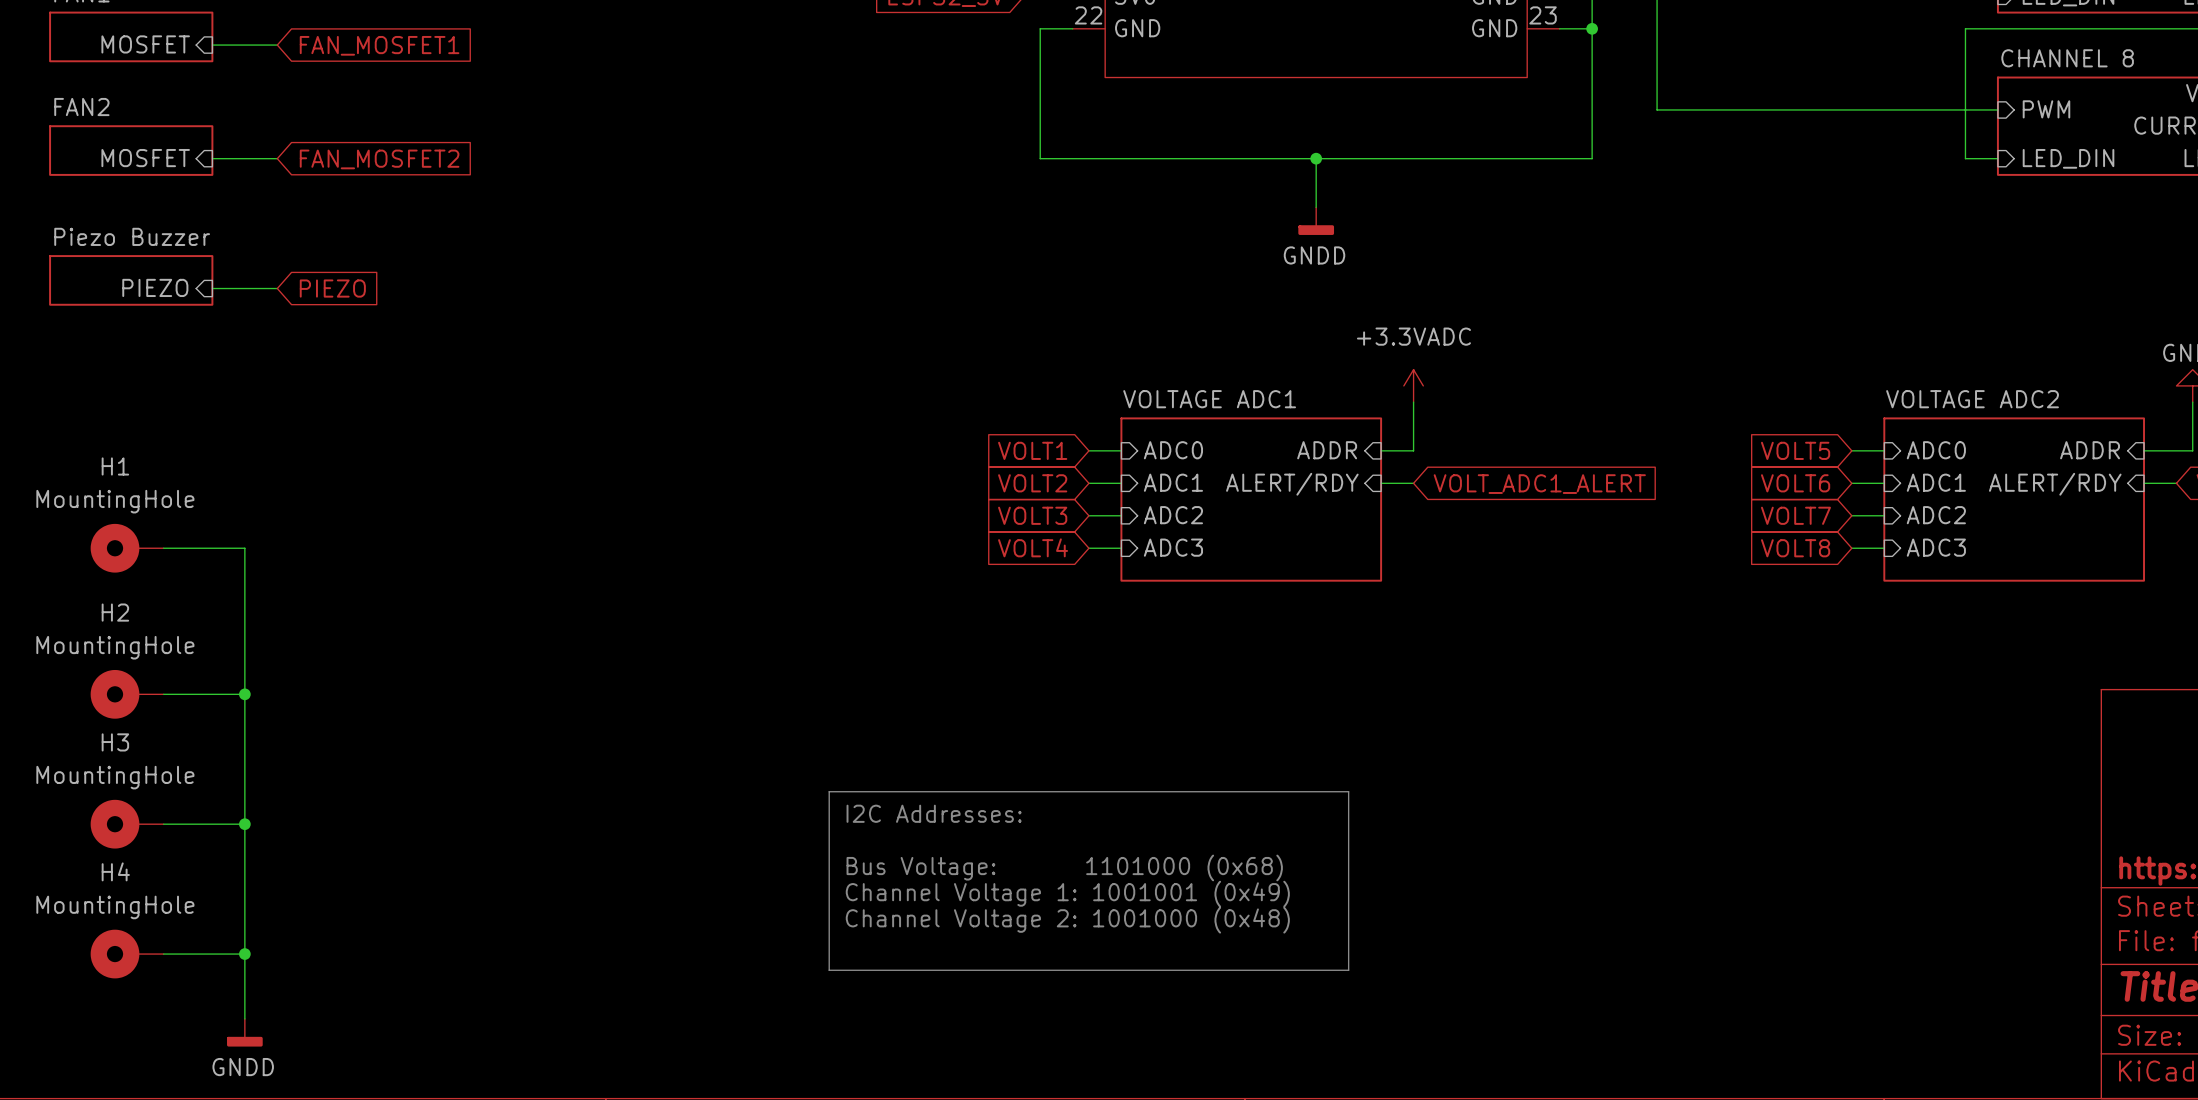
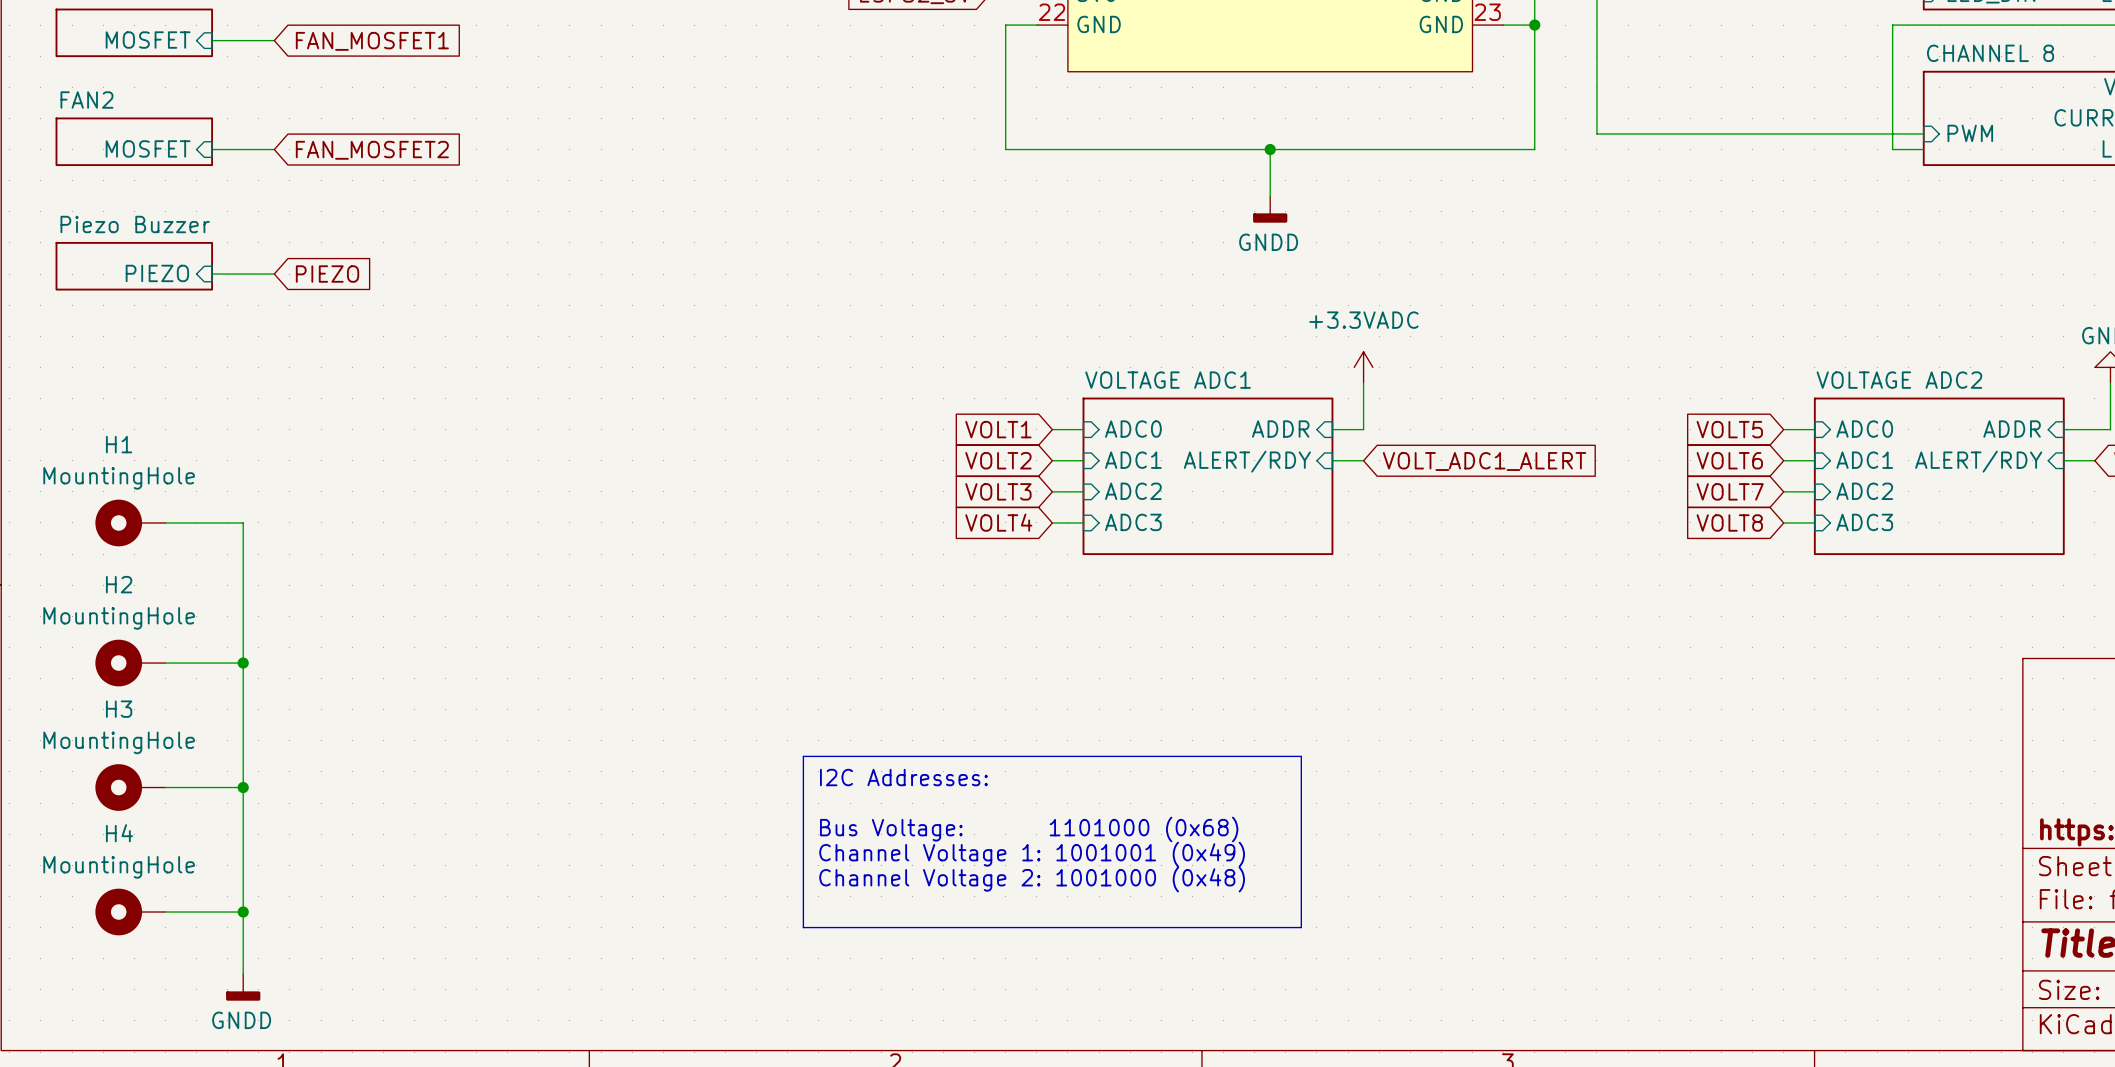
wire: (1657, 109) (1997, 109) -> (1596, 102) (1596, 133) (1923, 133)
sheet pin position: PWM (2046, 109) -> PWM (1970, 133)
sheet pin: LED_DIN (2068, 158) -> none

